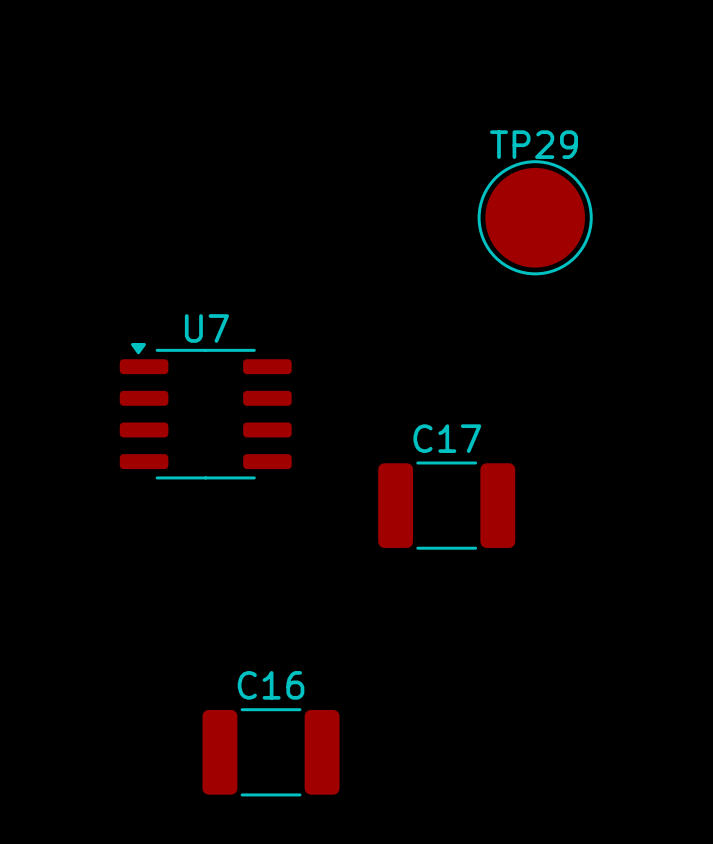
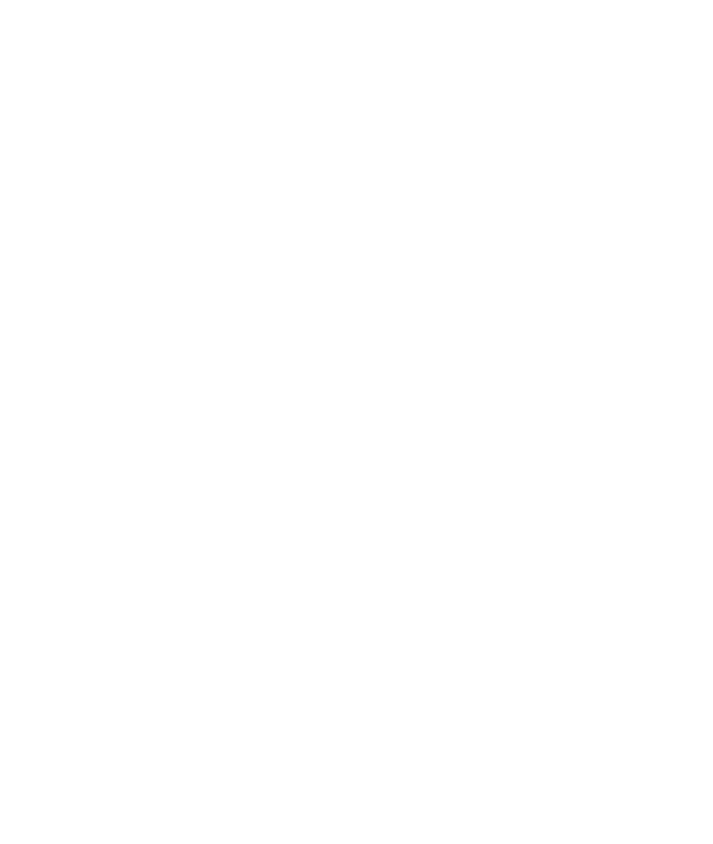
TP29: (535, 217) -> none
U7: (205, 411) -> none
C17: (446, 505) -> none
C16: (271, 752) -> none

